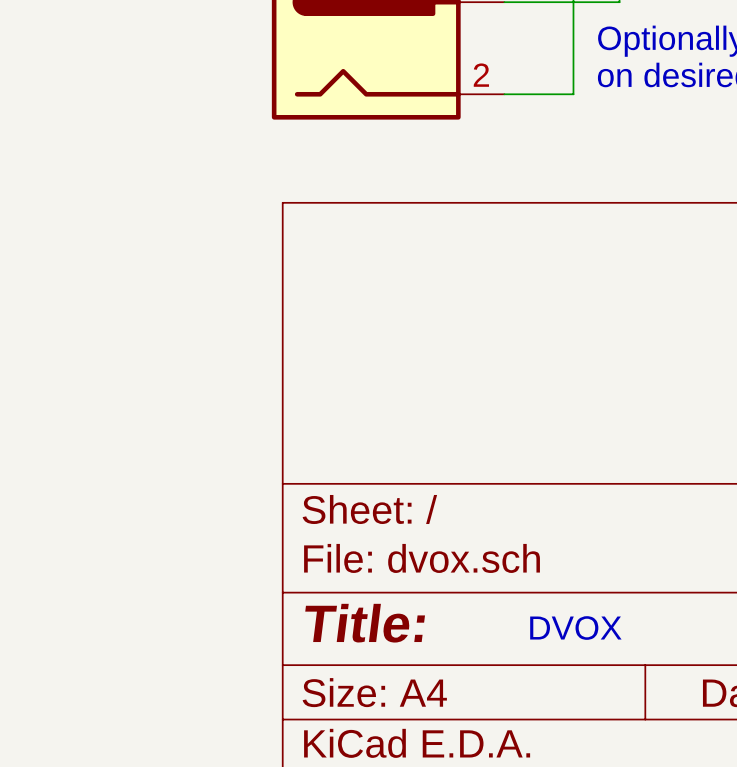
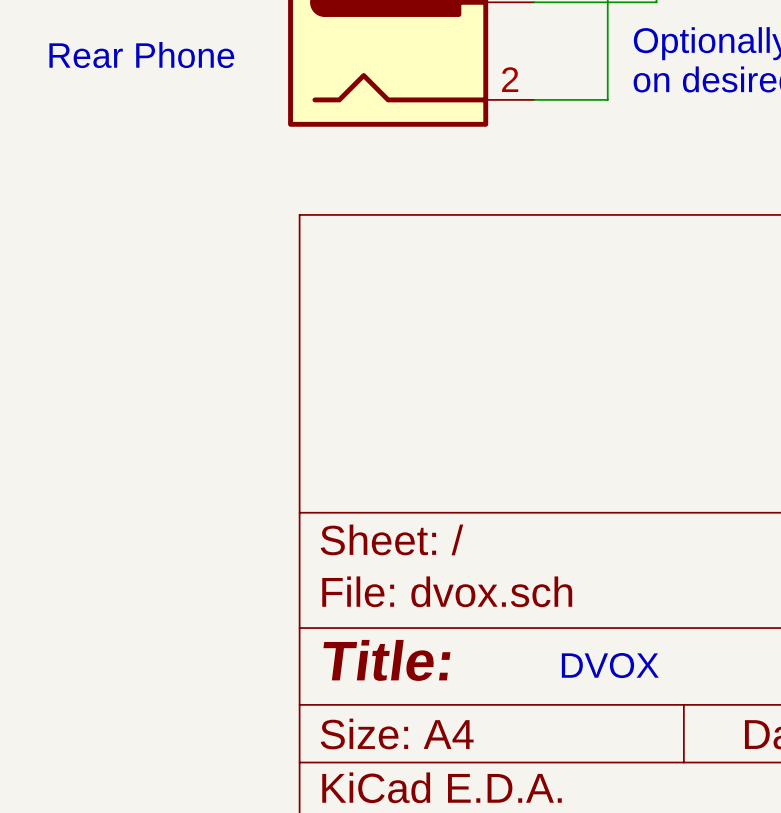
text: none -> Rear Phone (141, 55)

